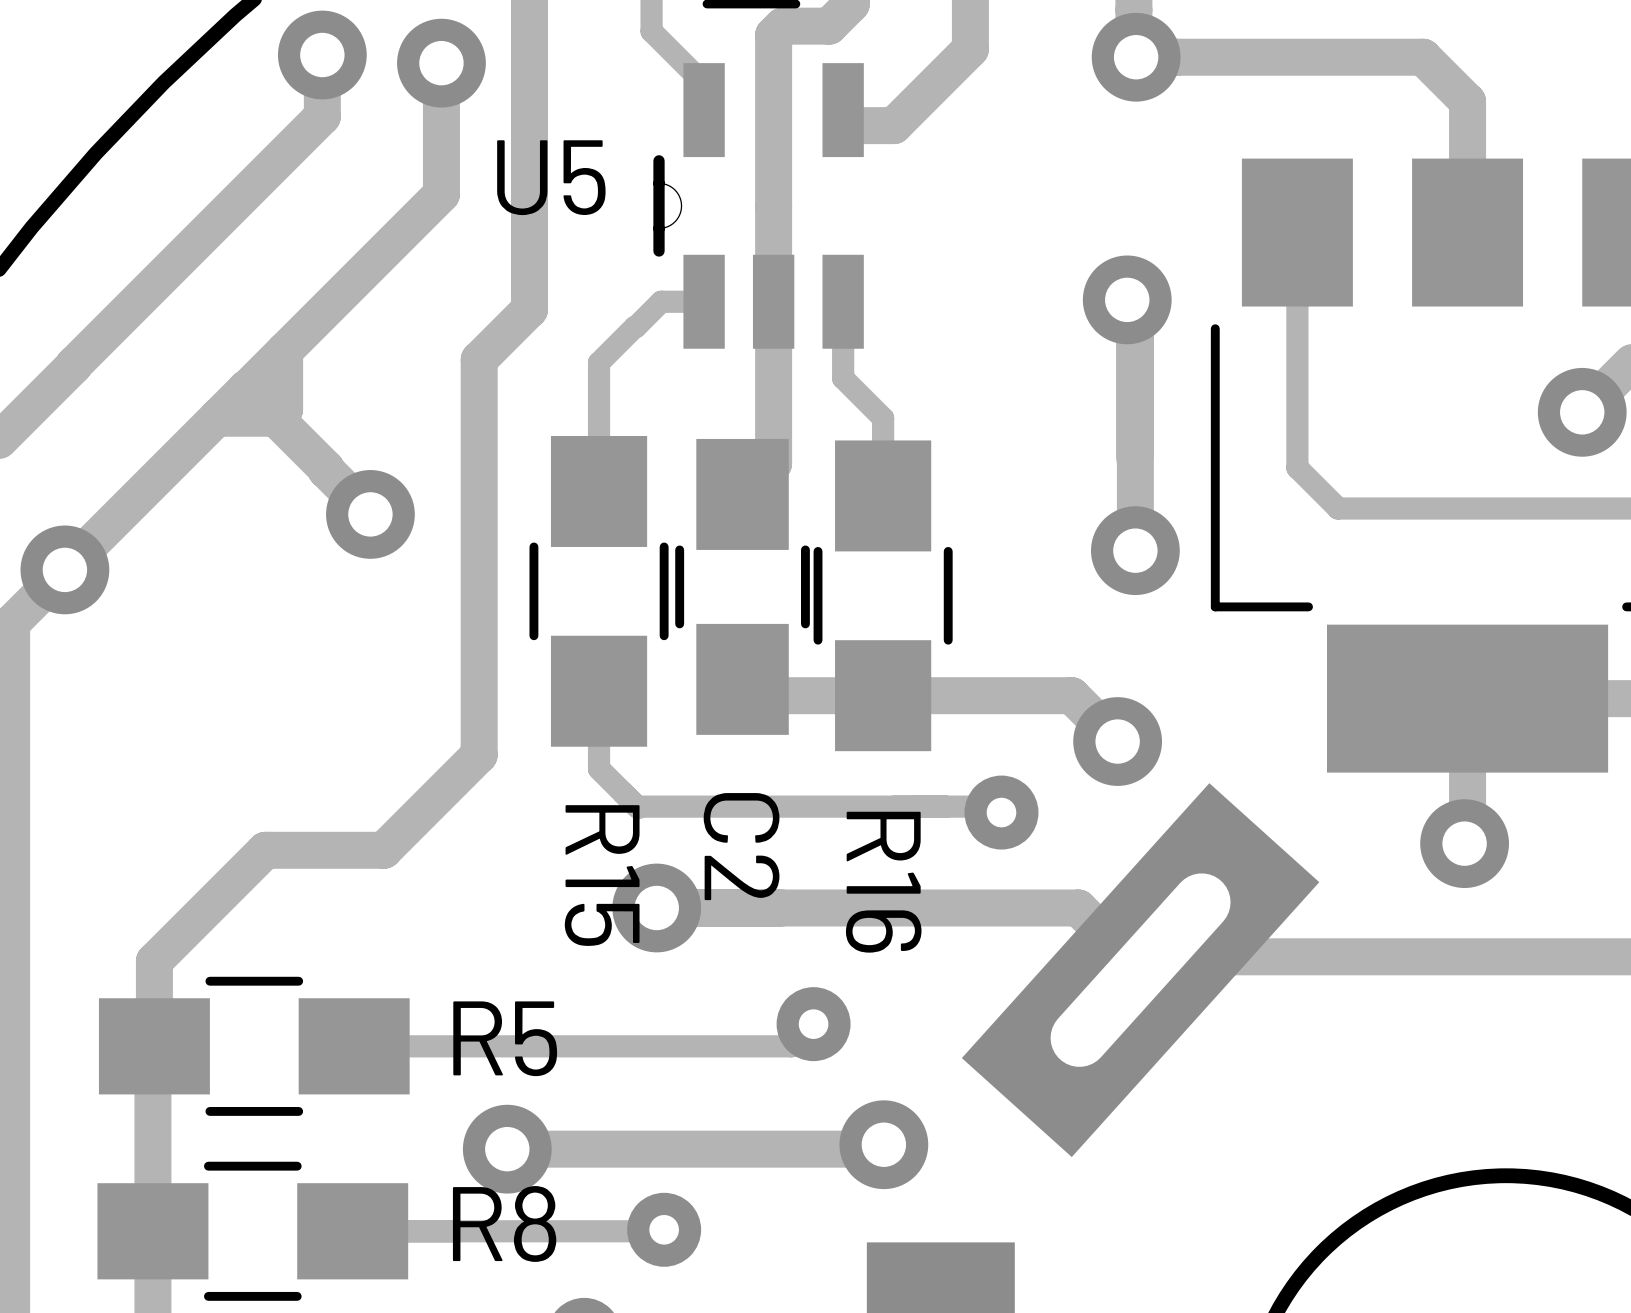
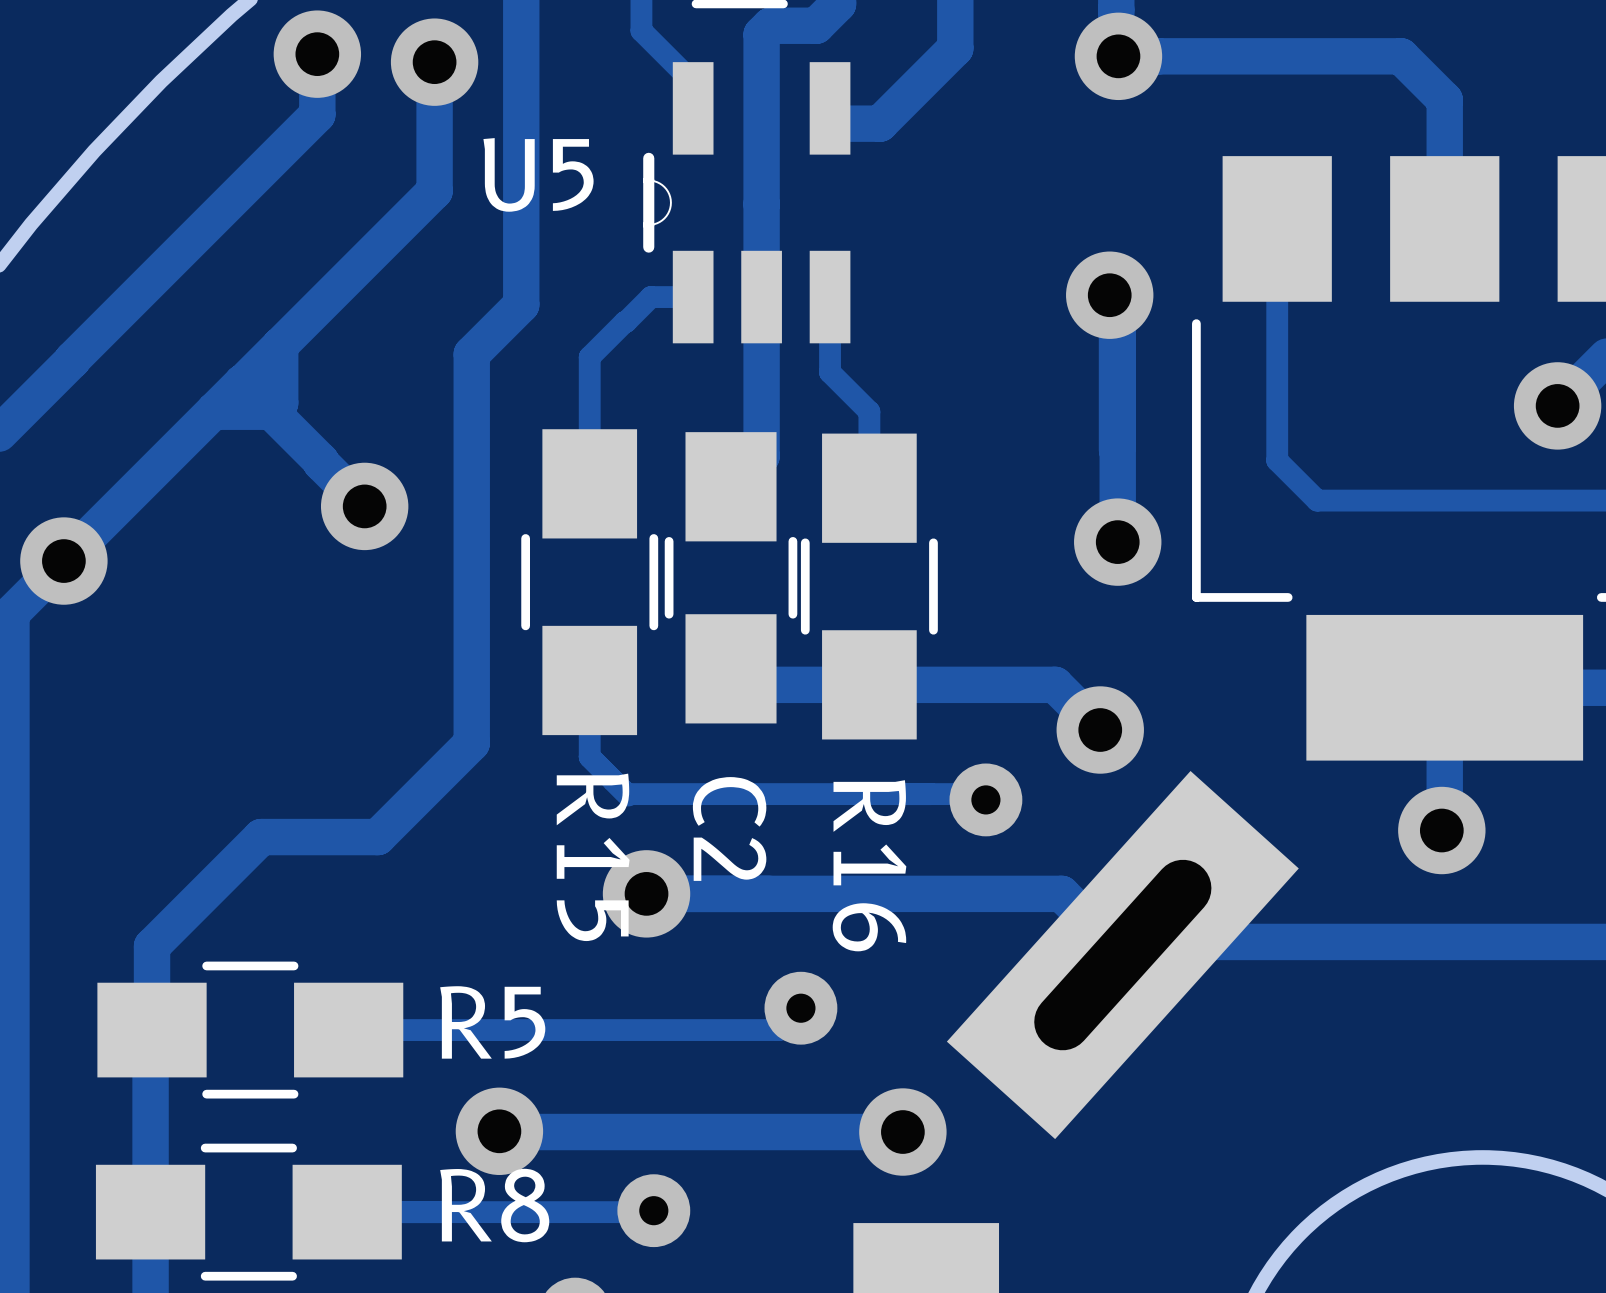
track: (883, 1144) (879, 1149) (507, 1149) -> (902, 1132) (500, 1132)
via position: (883, 1144) -> (902, 1132)

